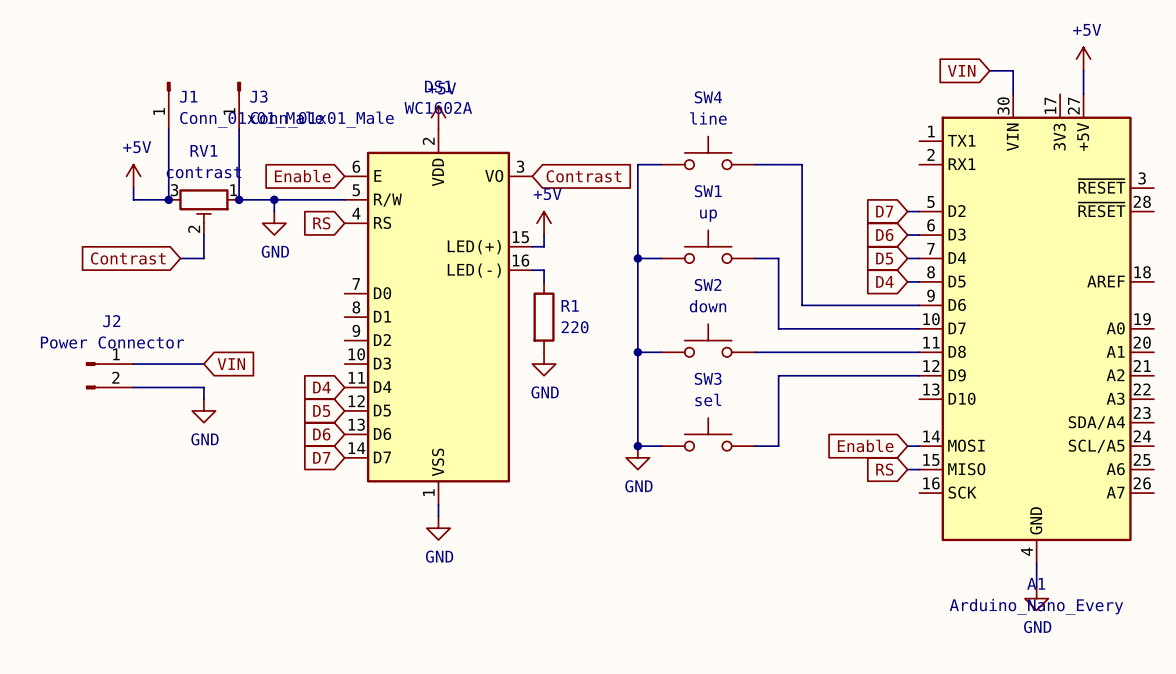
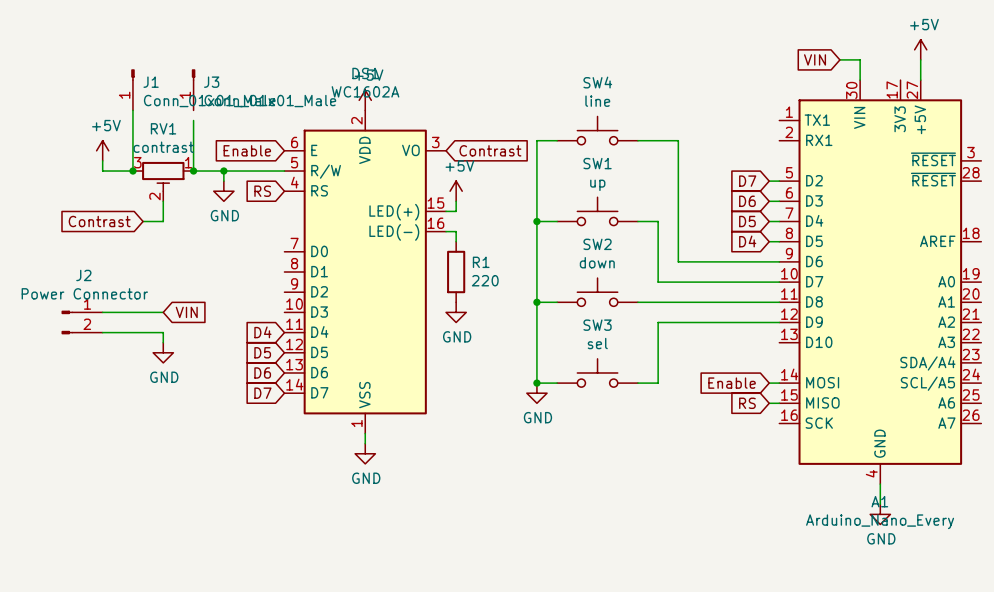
wire: (239, 129) (239, 141) -> none

